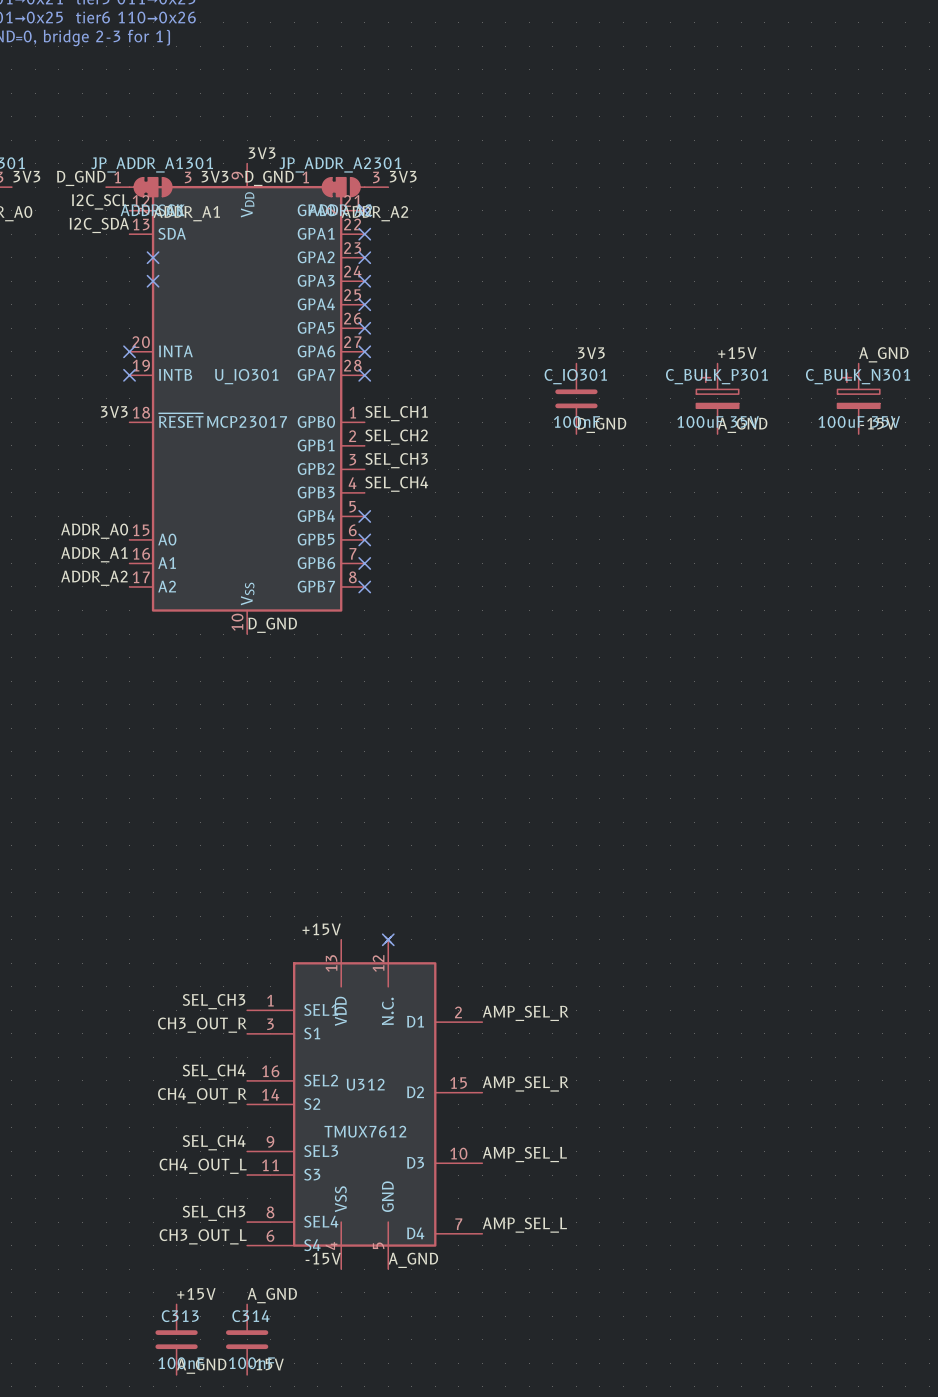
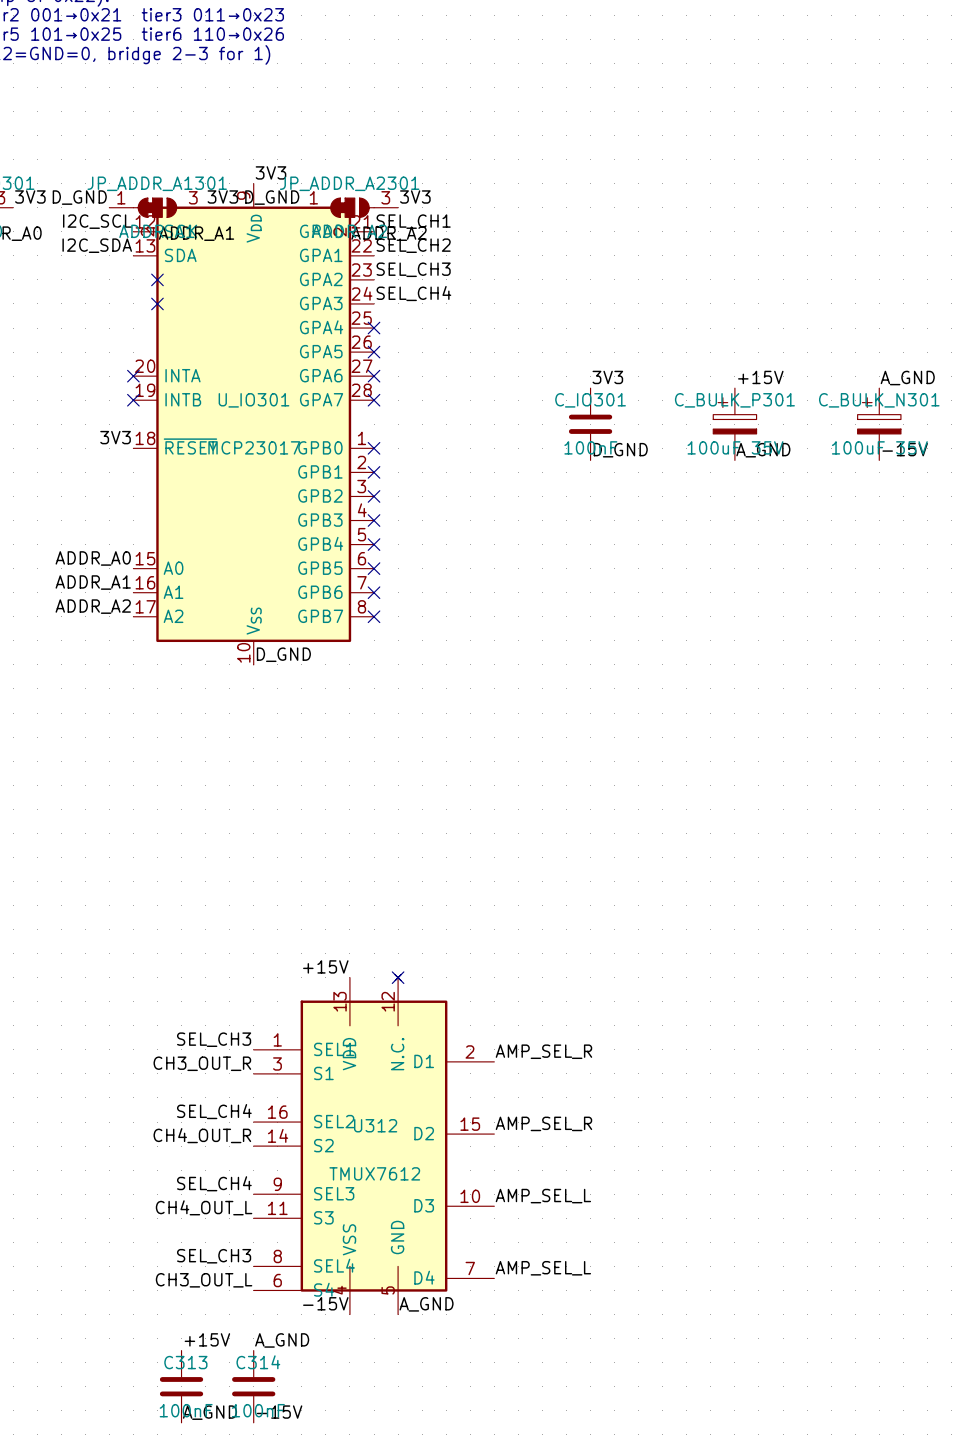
no-connect mark: (364, 210) -> none
no-connect mark: (364, 234) -> none
no-connect mark: (364, 257) -> none
no-connect mark: (364, 281) -> none
label position: SEL_CH1 (396, 413) -> SEL_CH1 (413, 221)
no-connect mark: none -> (374, 448)
label position: SEL_CH2 (396, 437) -> SEL_CH2 (413, 245)
no-connect mark: none -> (374, 472)
label position: SEL_CH3 (396, 460) -> SEL_CH3 (413, 269)
no-connect mark: none -> (374, 496)
label position: SEL_CH4 (396, 484) -> SEL_CH4 (413, 293)
no-connect mark: none -> (374, 520)

